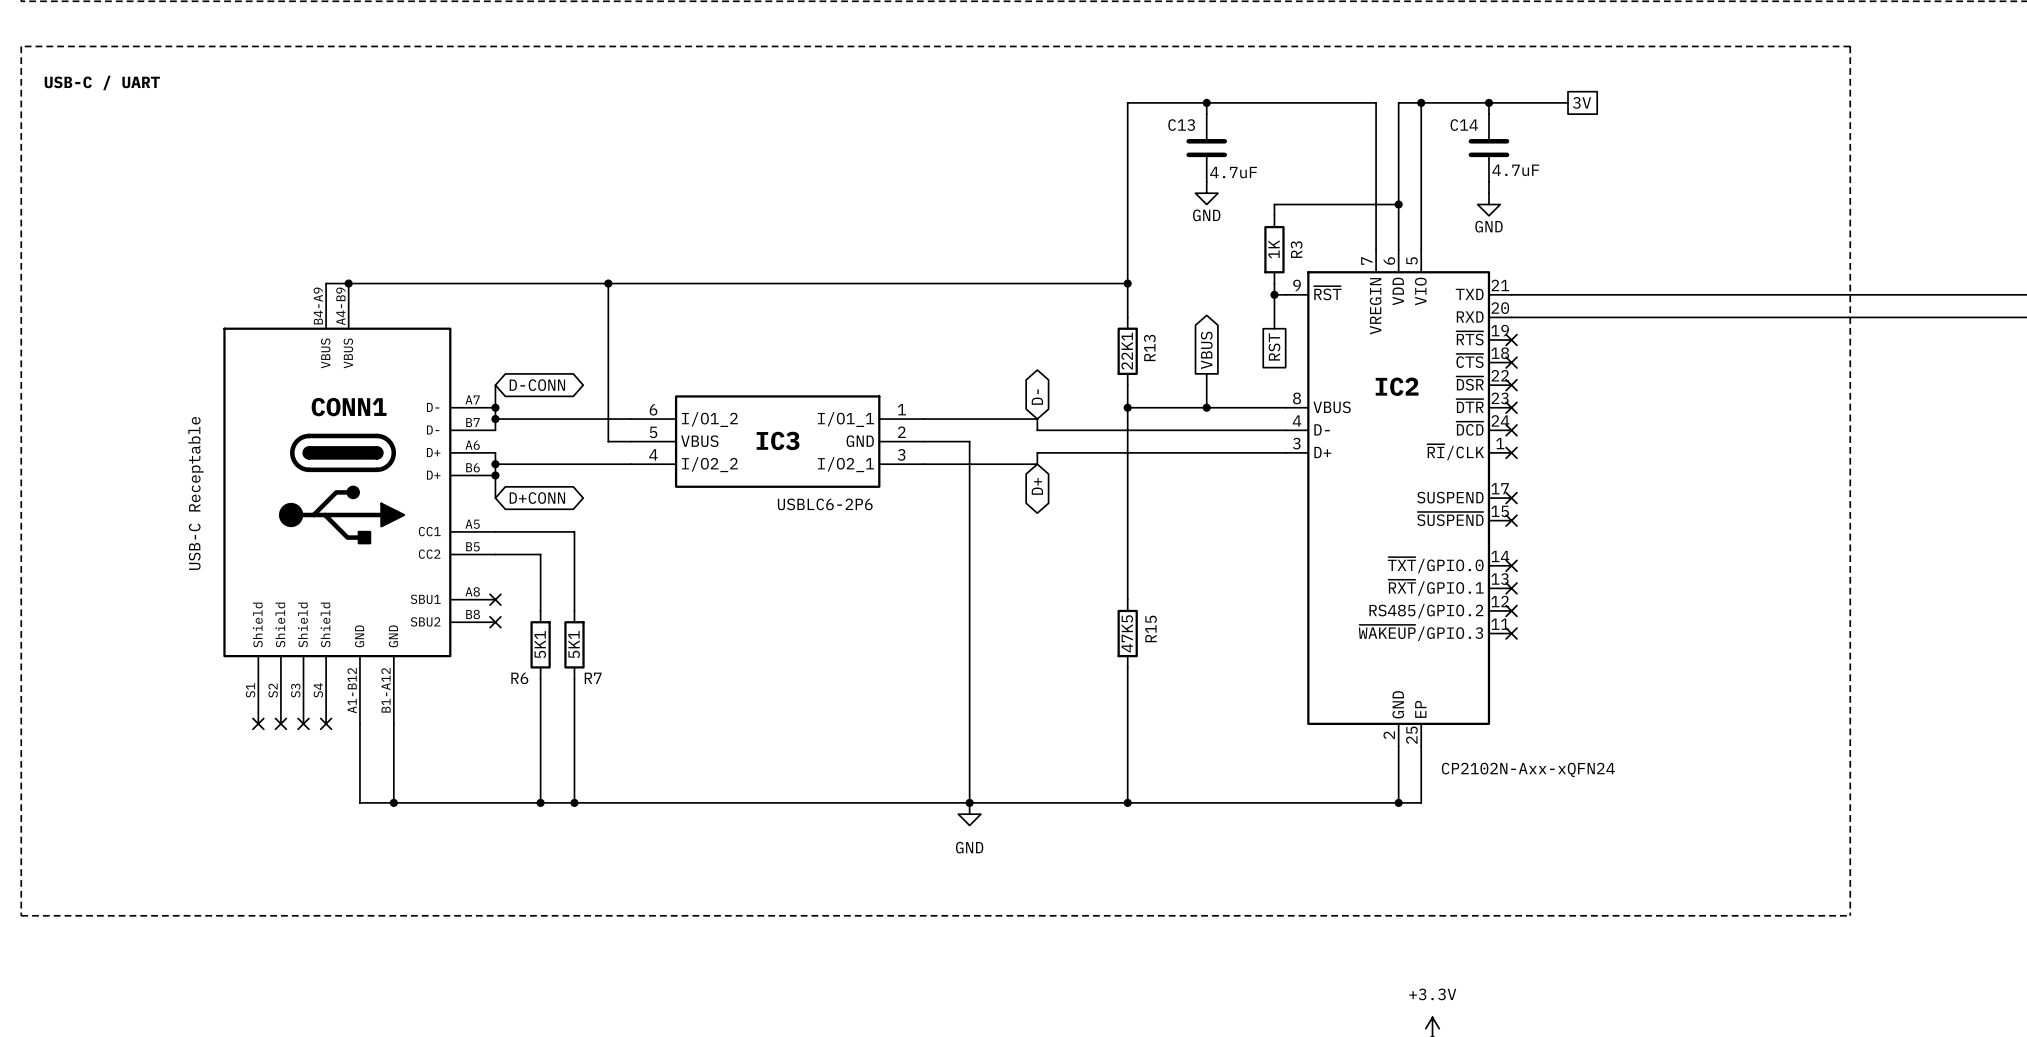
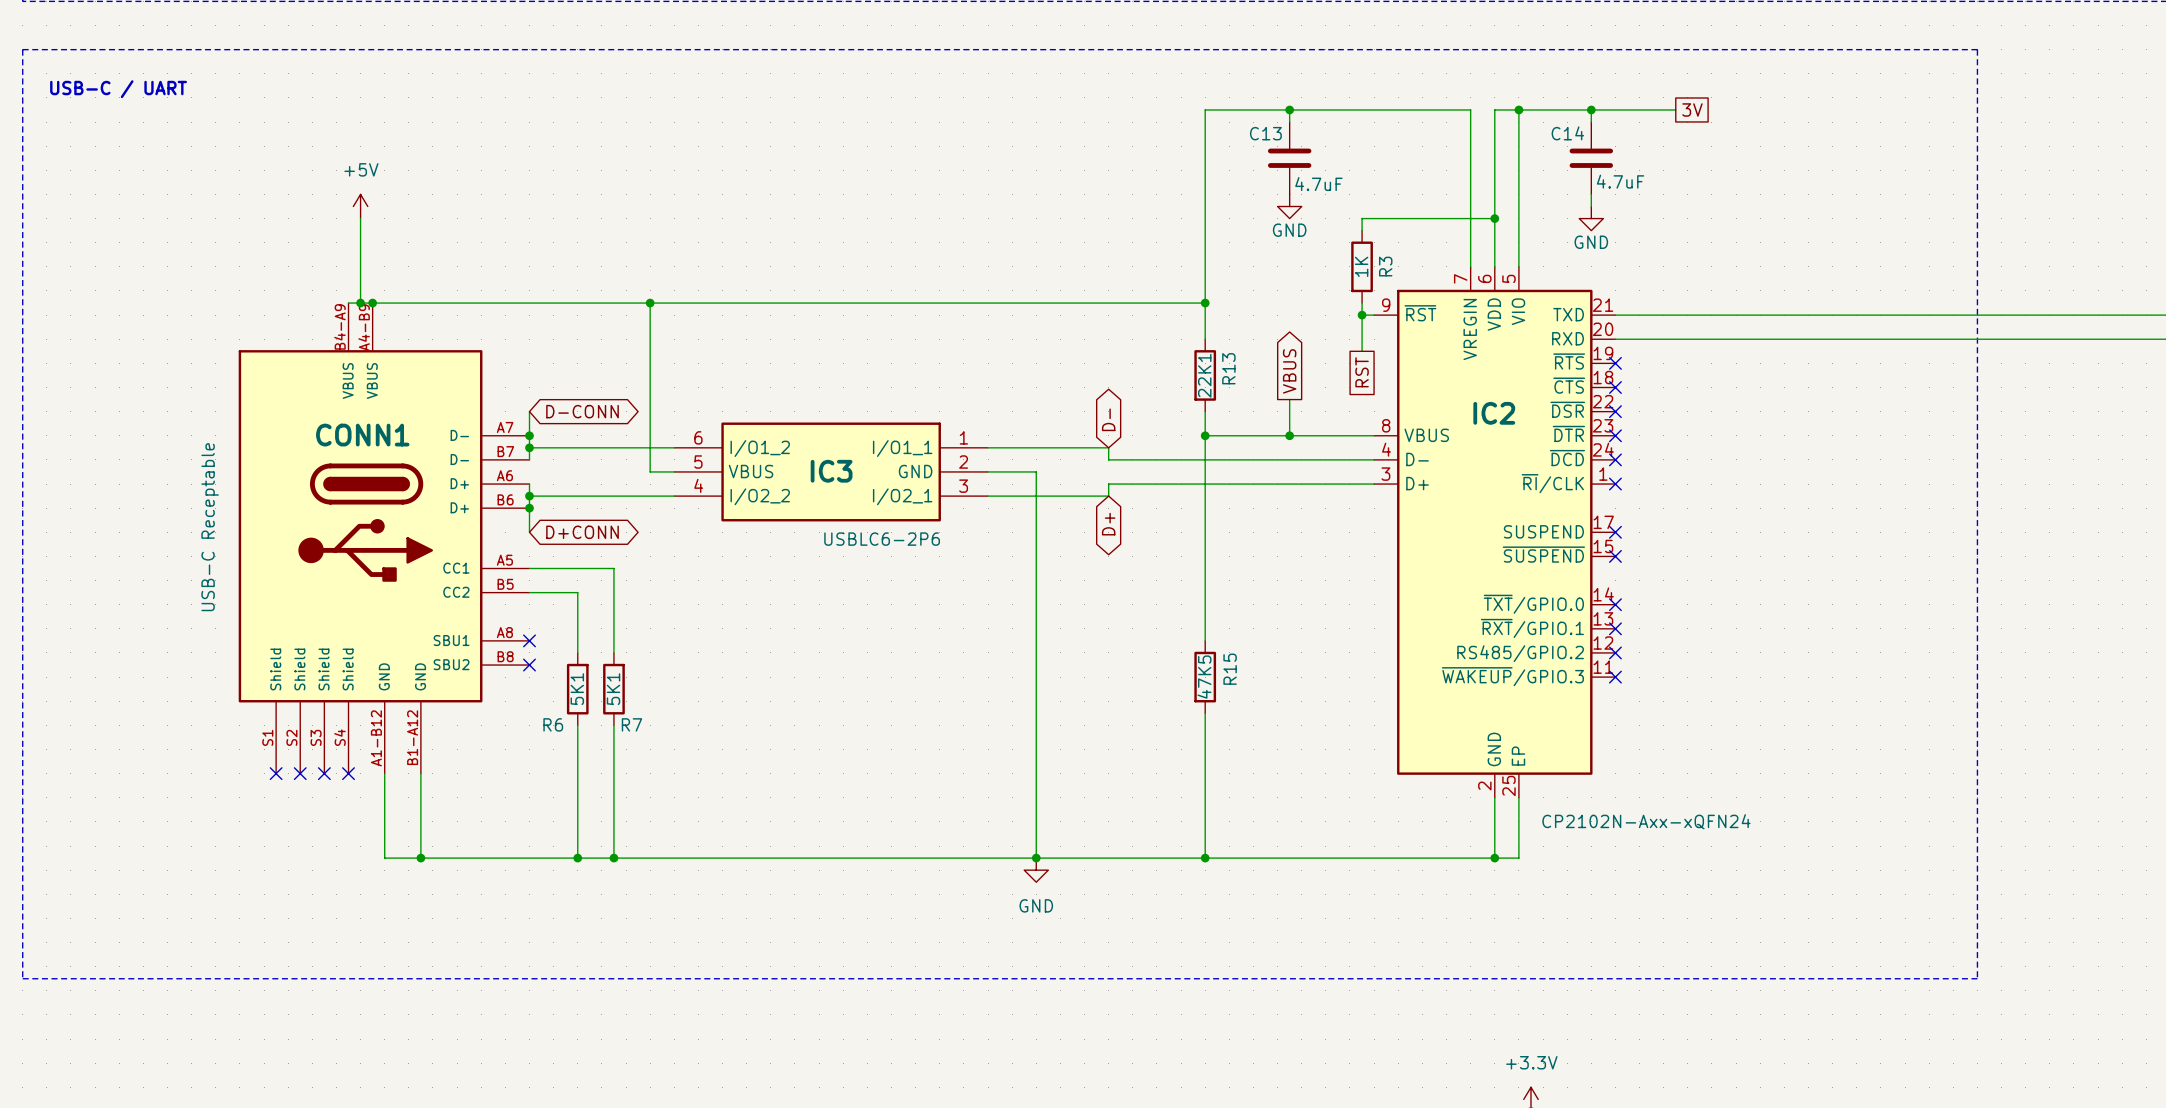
power symbol: none -> +5V (360, 206)
wire: none -> (360, 218) (360, 303)
junction: none -> (360, 303)

